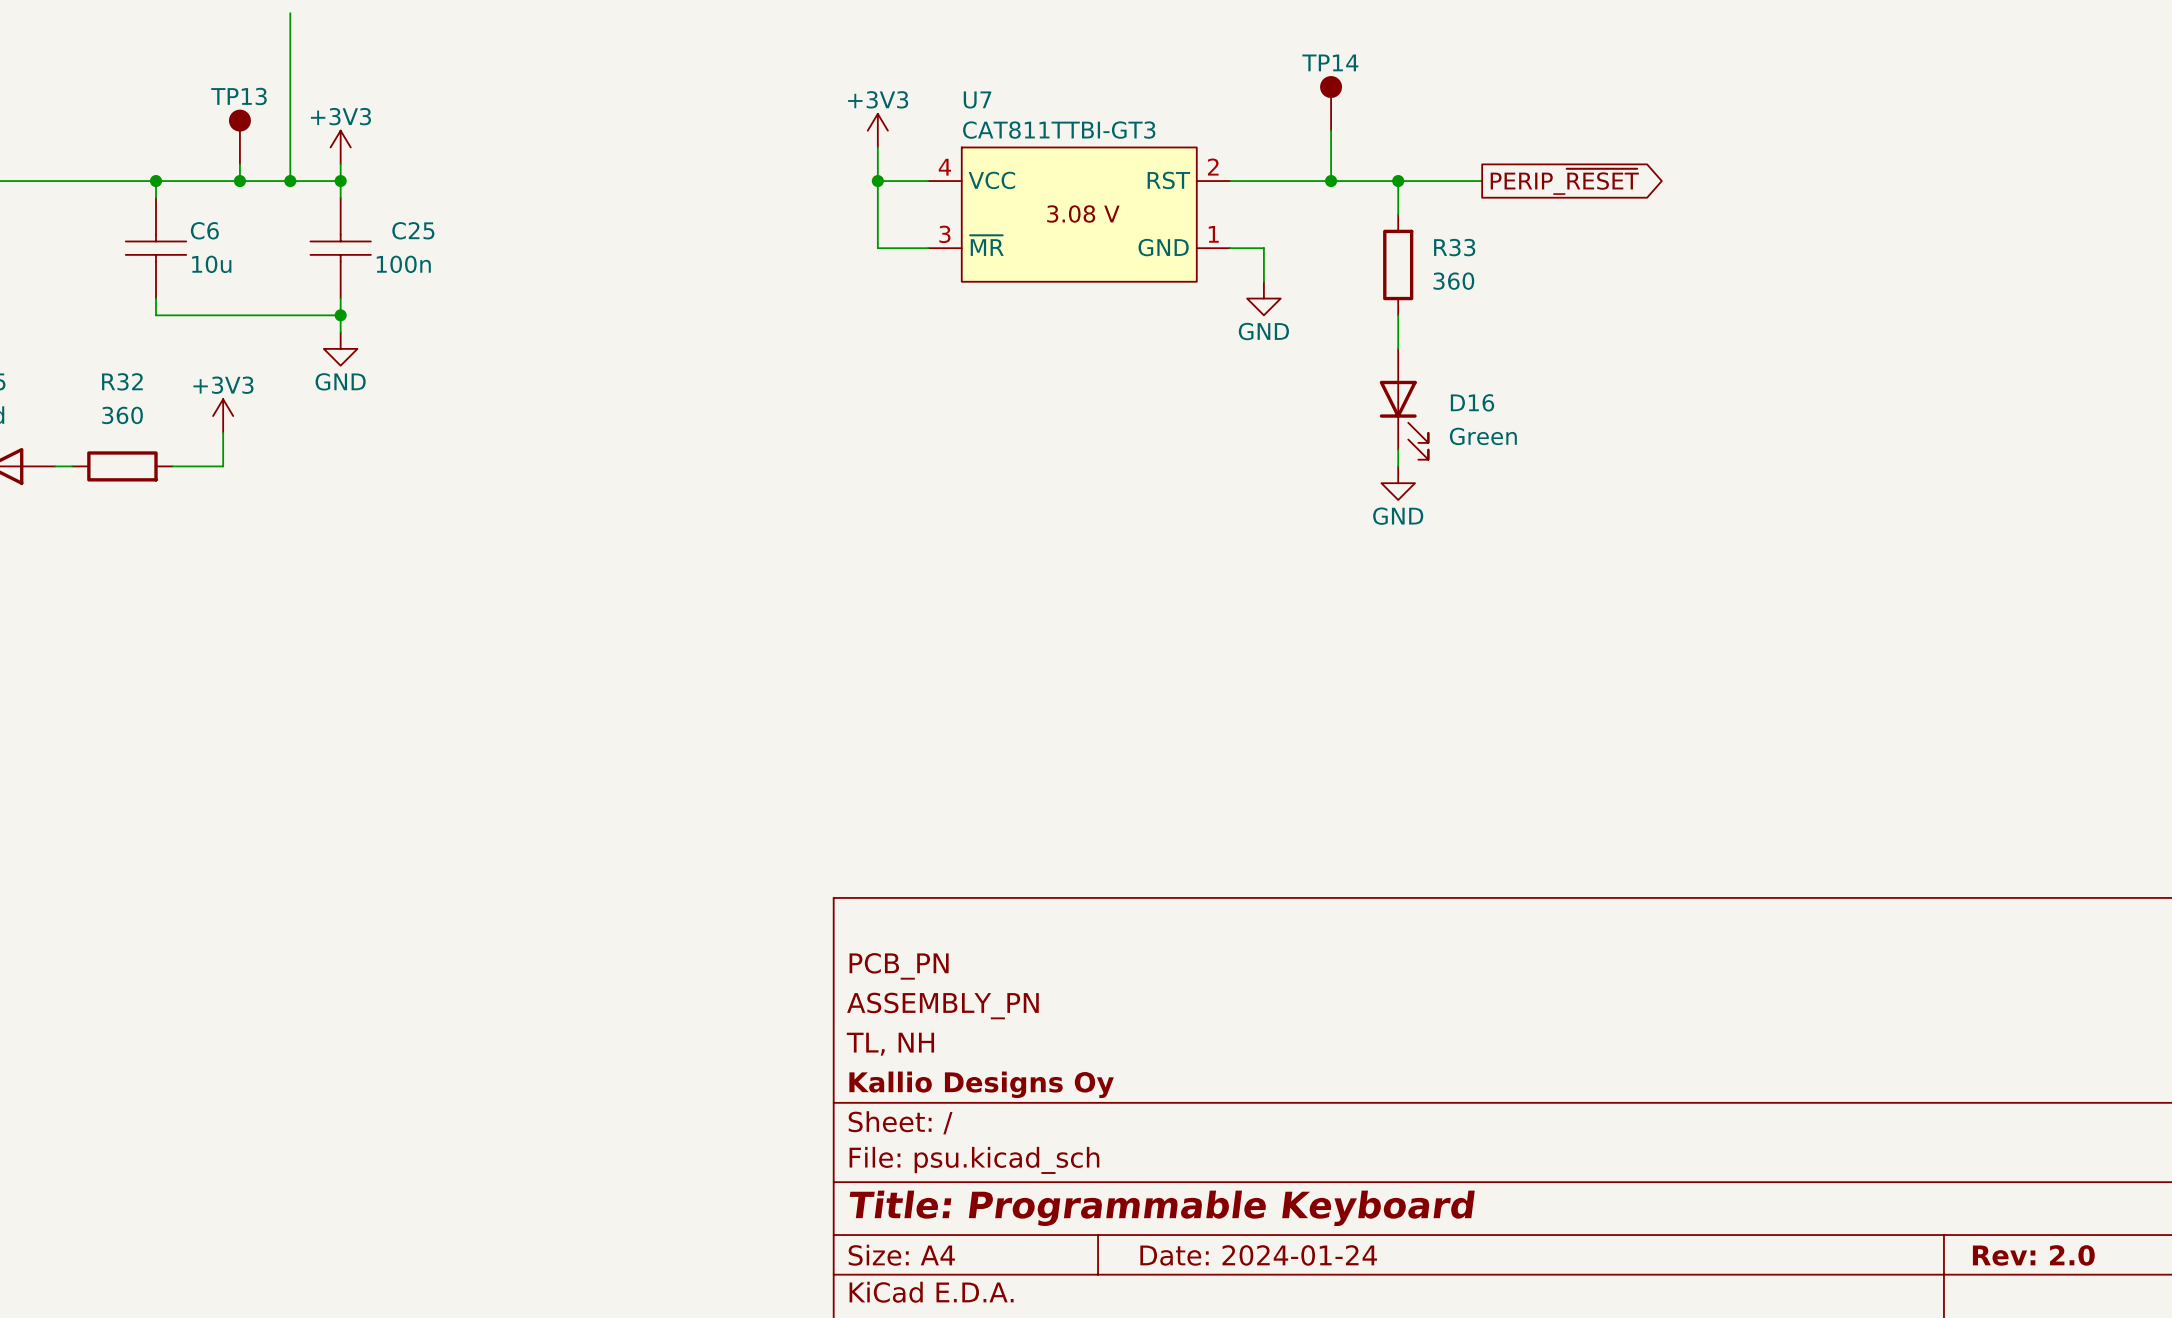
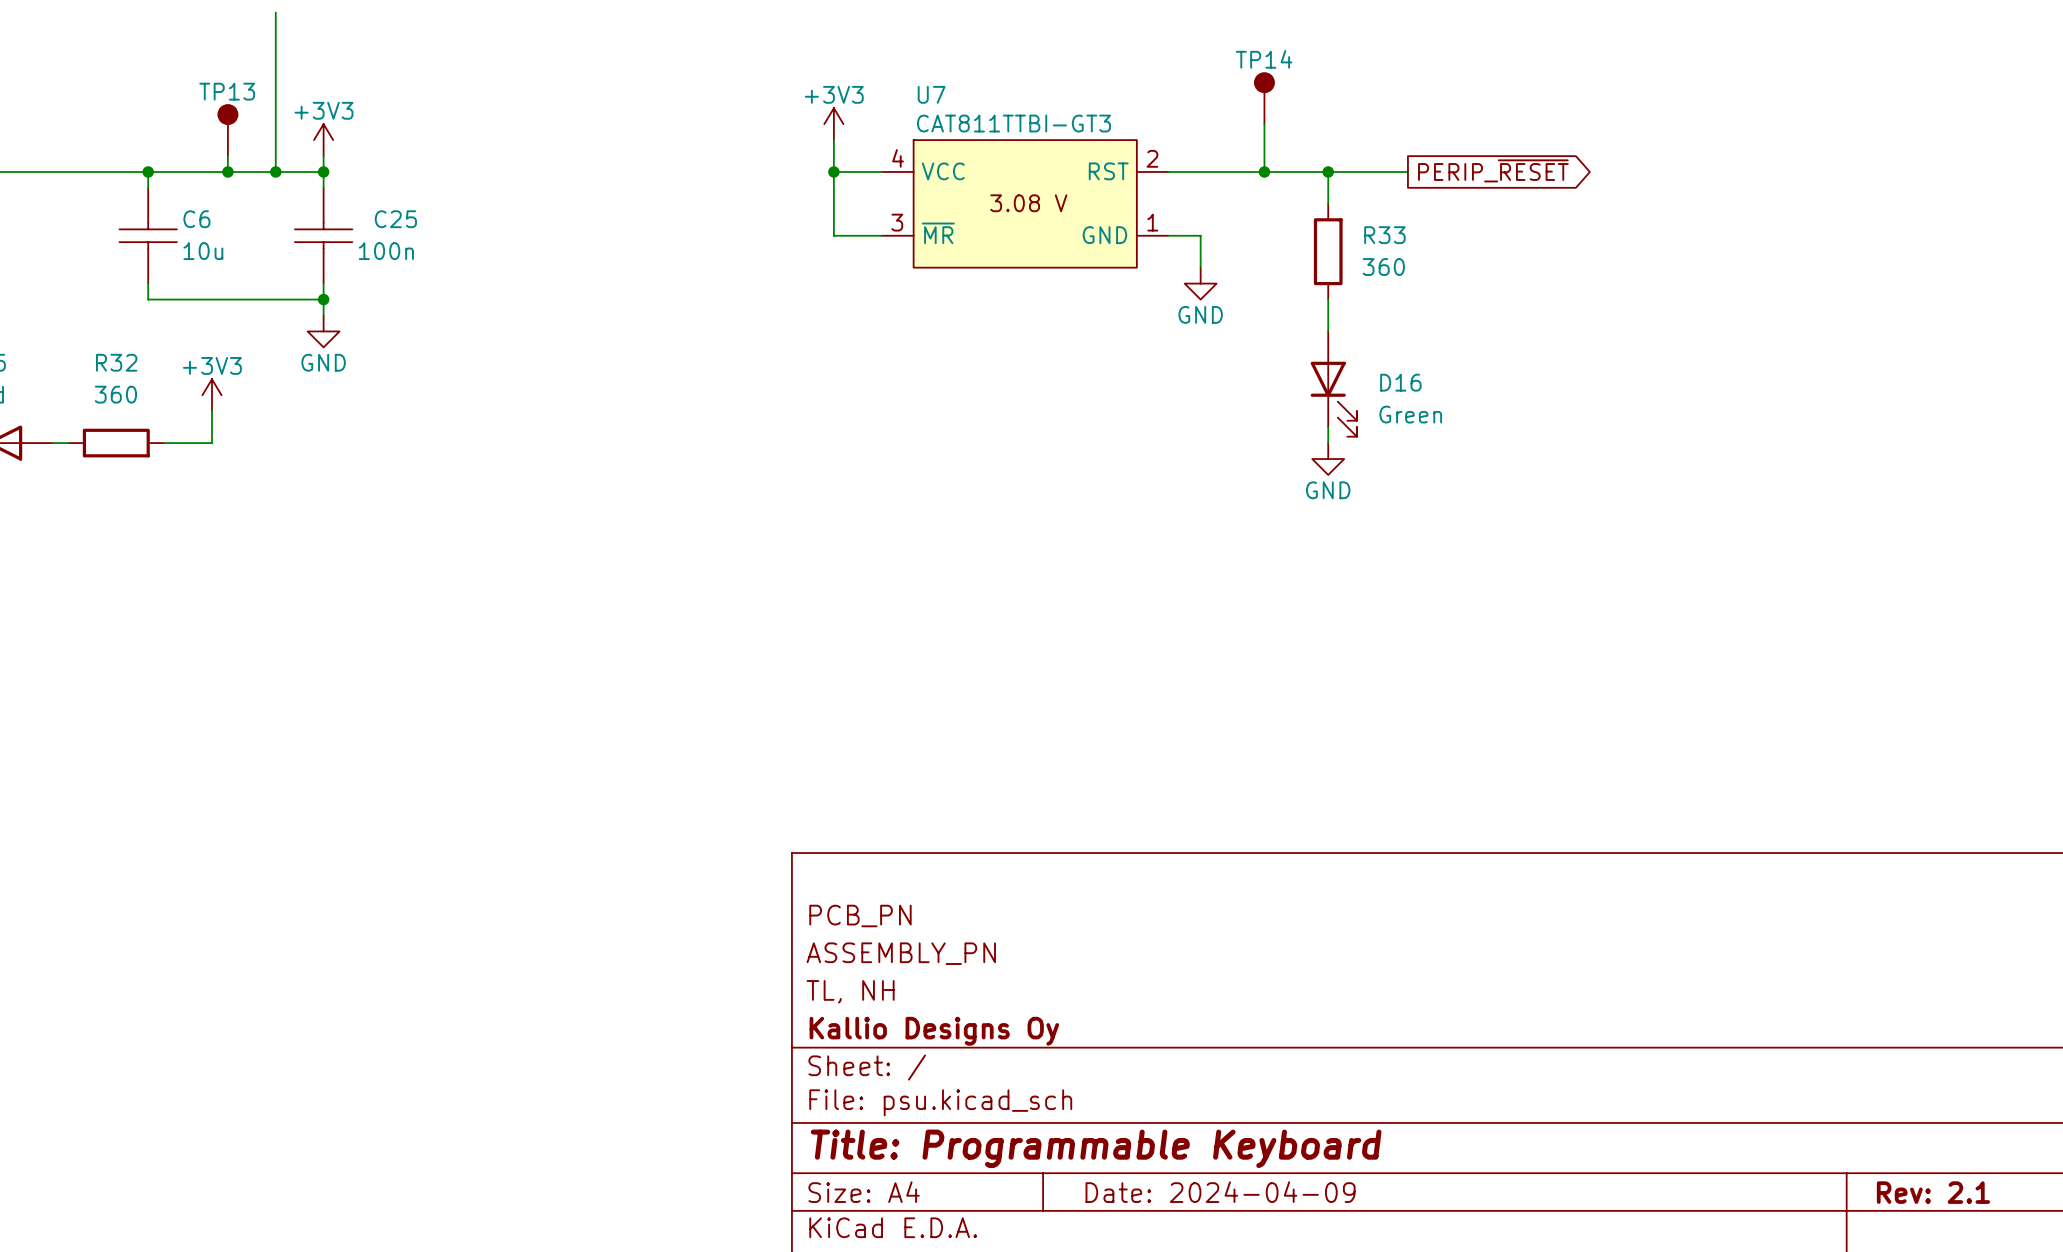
title block: Date: 2024-01-24 (1258, 1255) -> Date: 2024-04-09 (1220, 1192)
title block: Rev: 2.0 (2033, 1255) -> Rev: 2.1 (1933, 1192)

